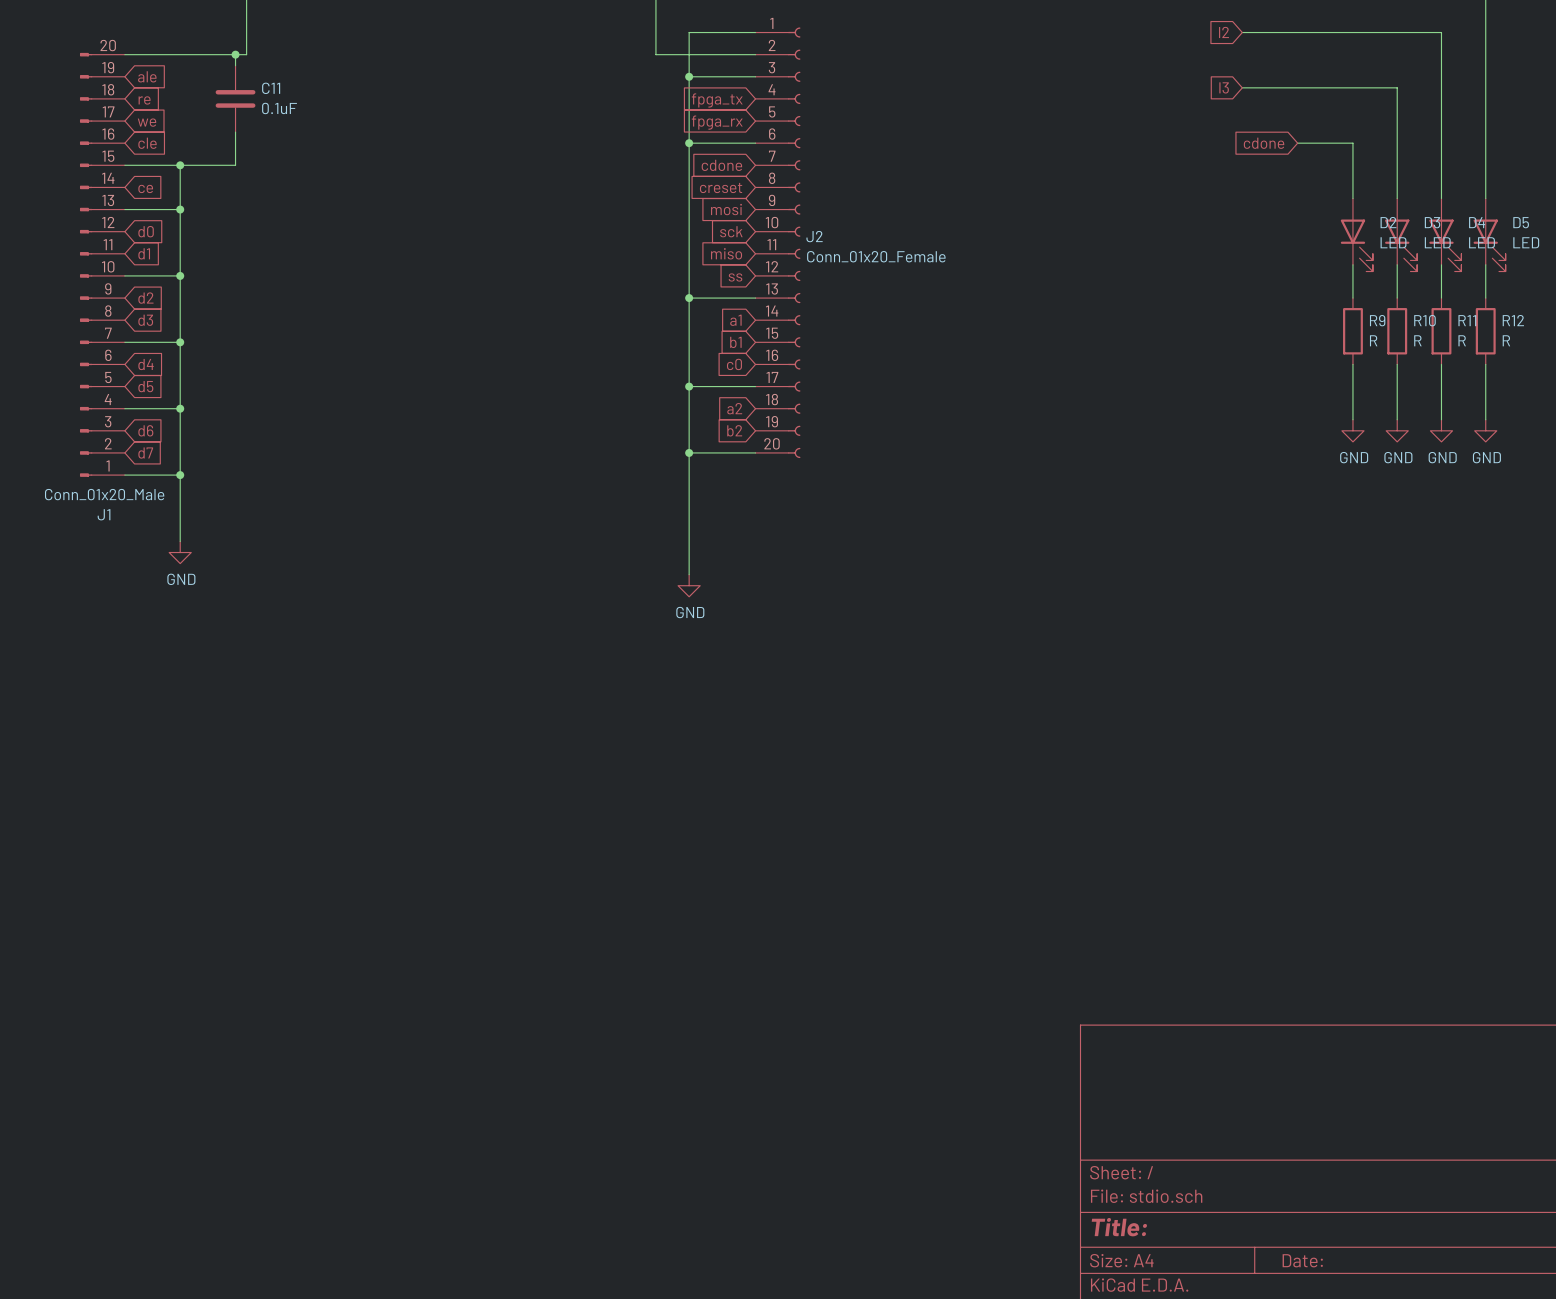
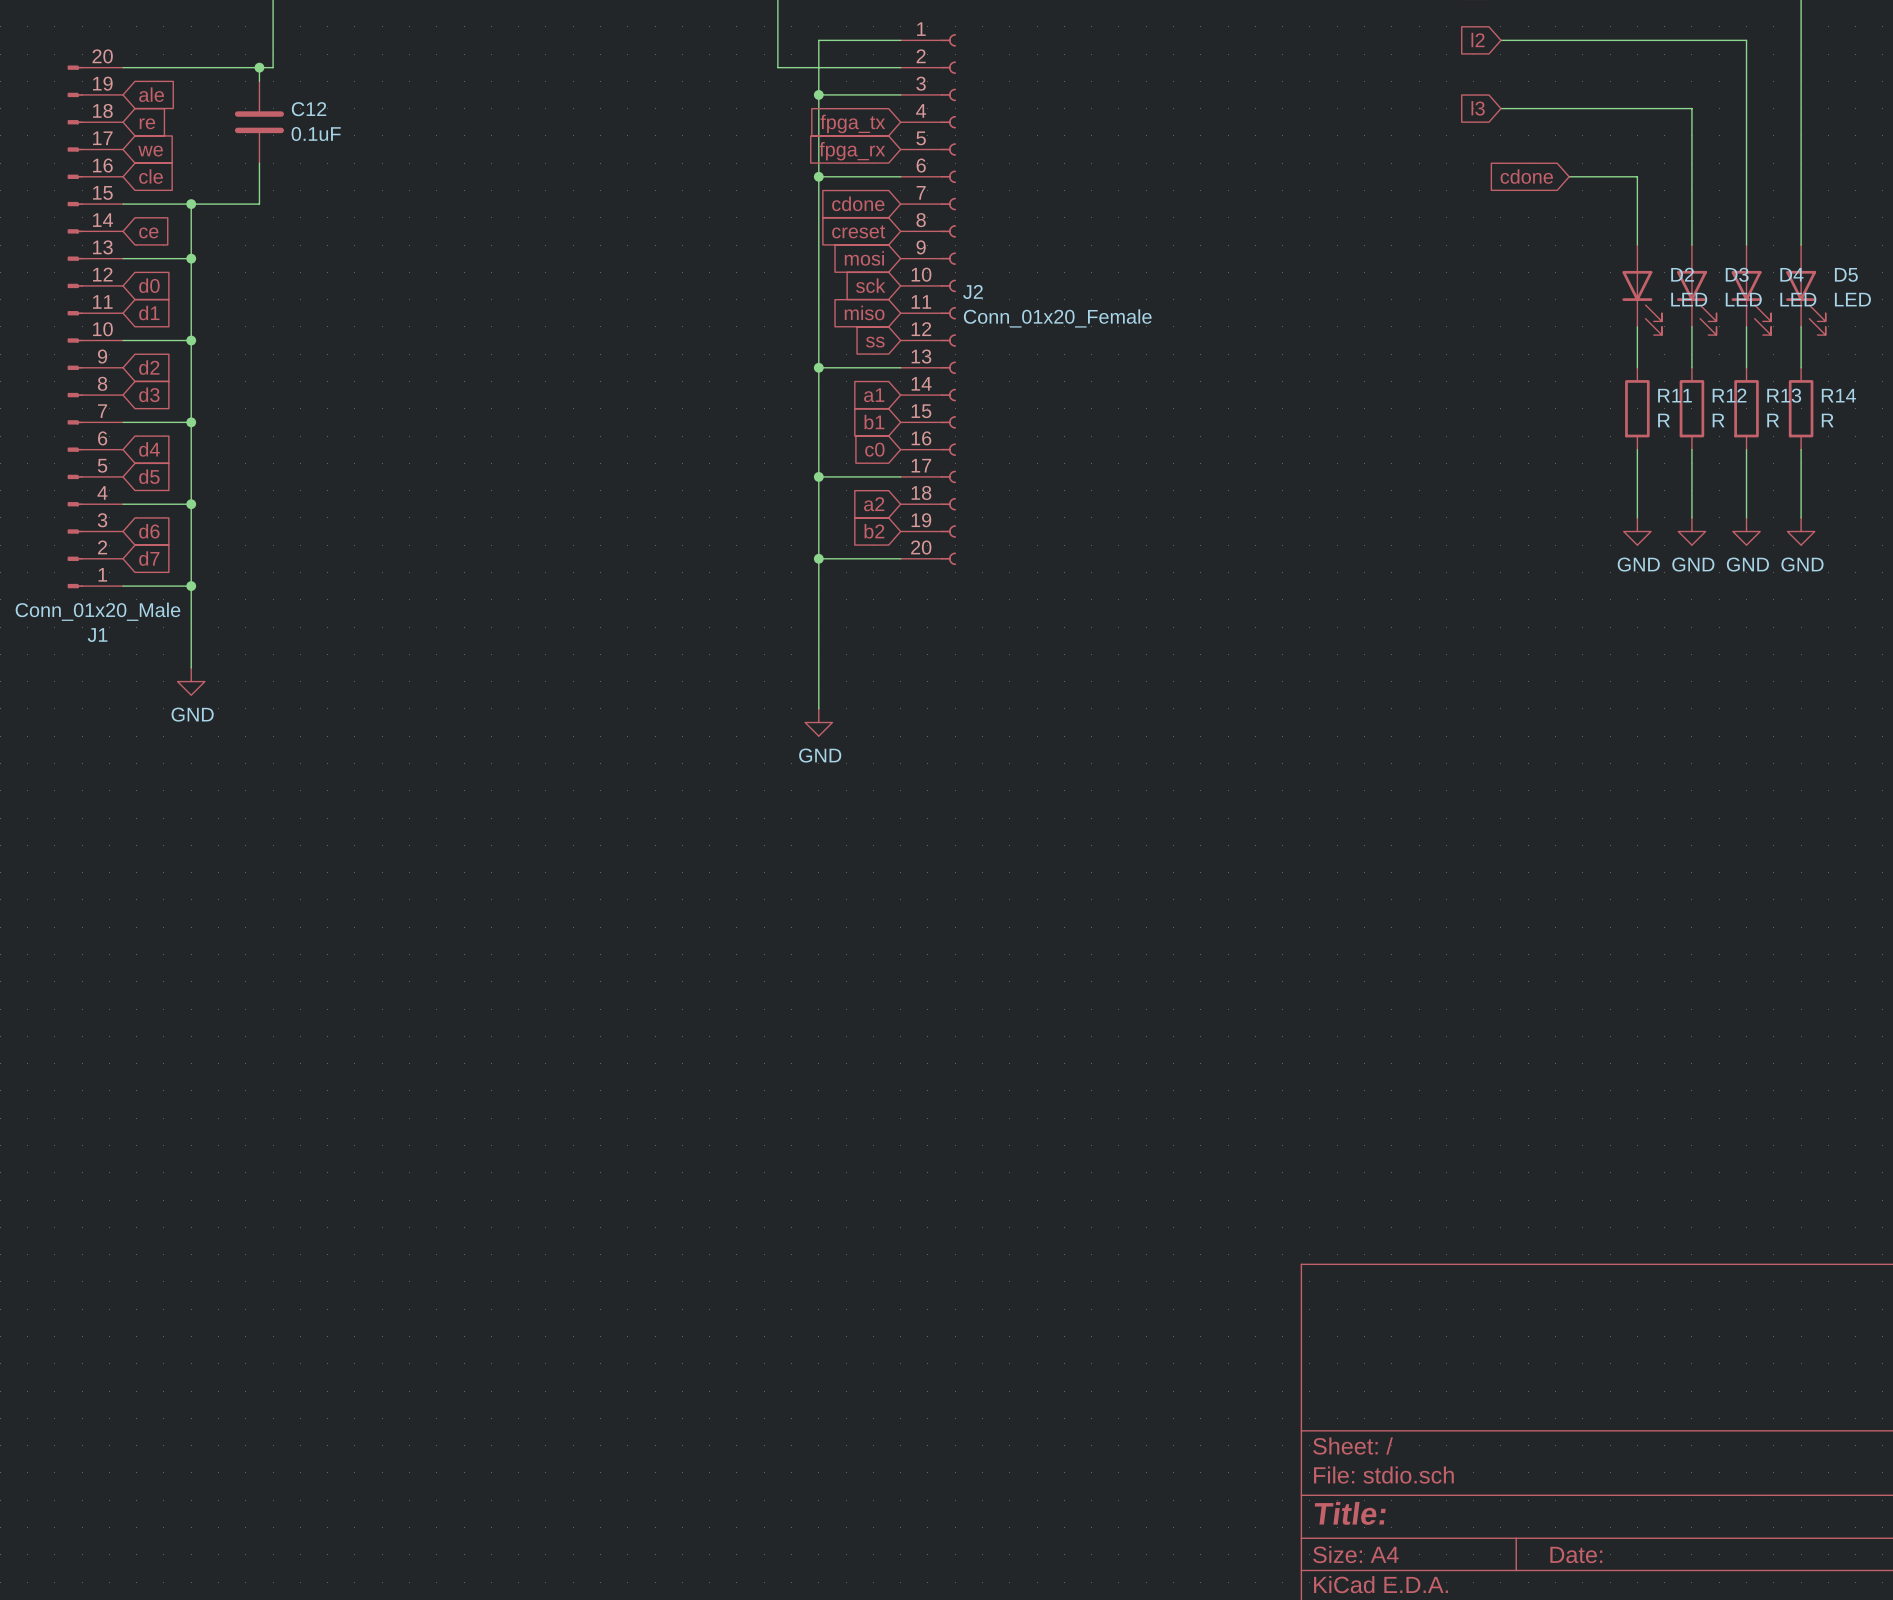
C11 name: C11 (271, 88) -> C12 (309, 109)
R9 name: R9 (1377, 320) -> R11 (1675, 395)
R10 name: R10 (1424, 320) -> R12 (1729, 395)
R11 name: R11 (1467, 320) -> R13 (1784, 395)
R12 name: R12 (1513, 320) -> R14 (1838, 395)

